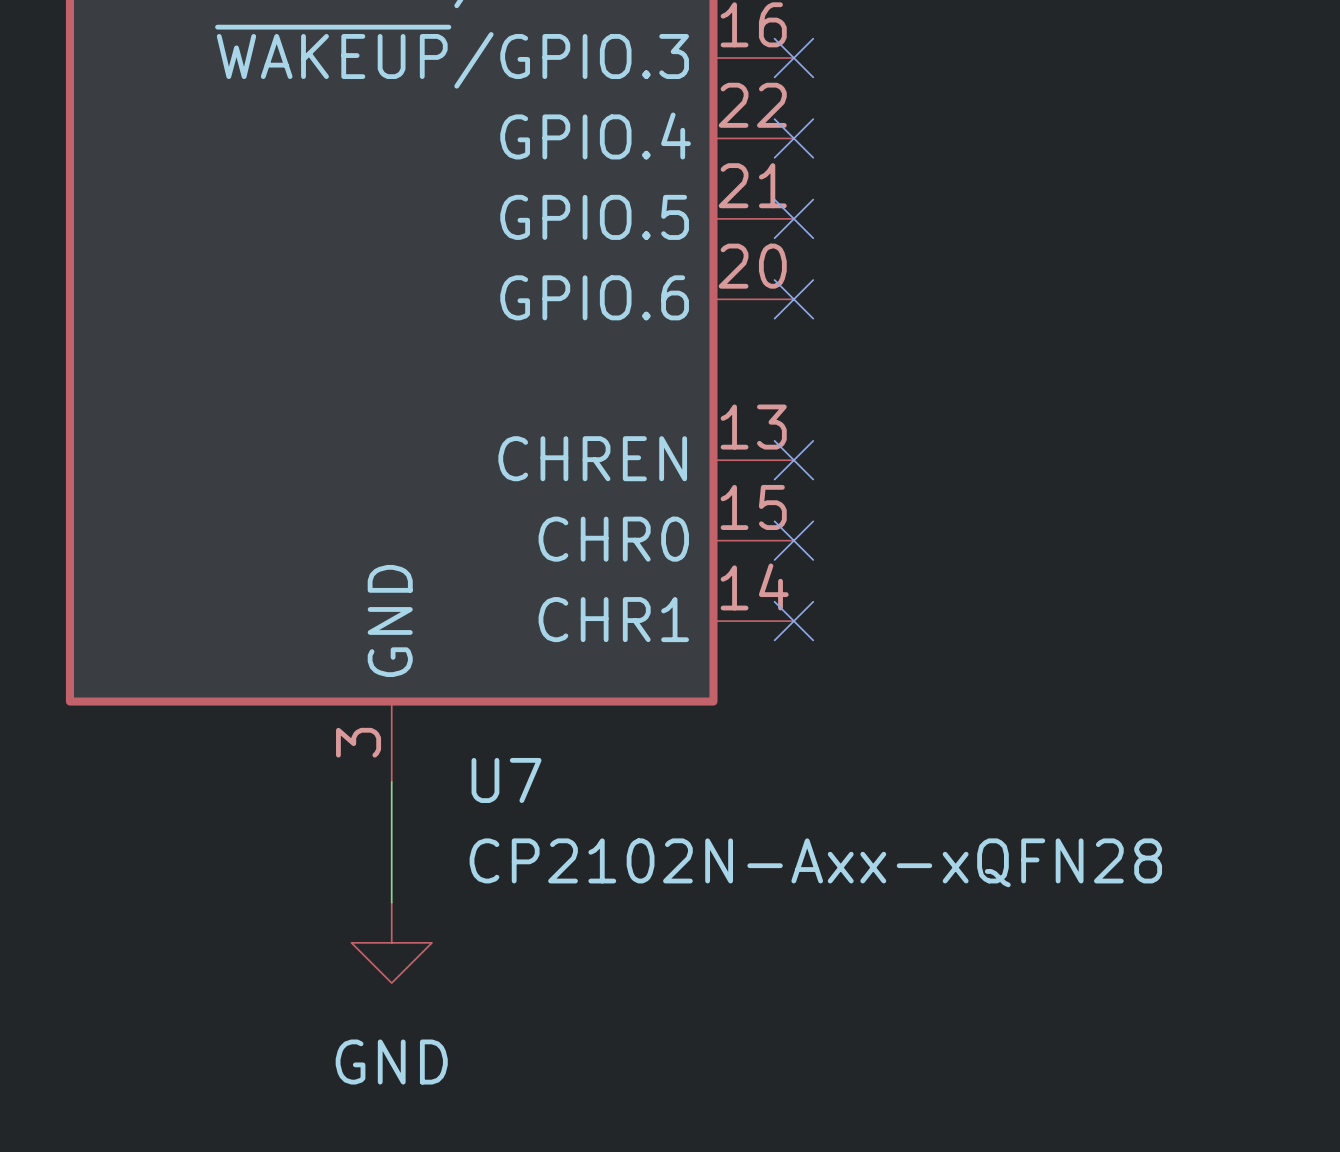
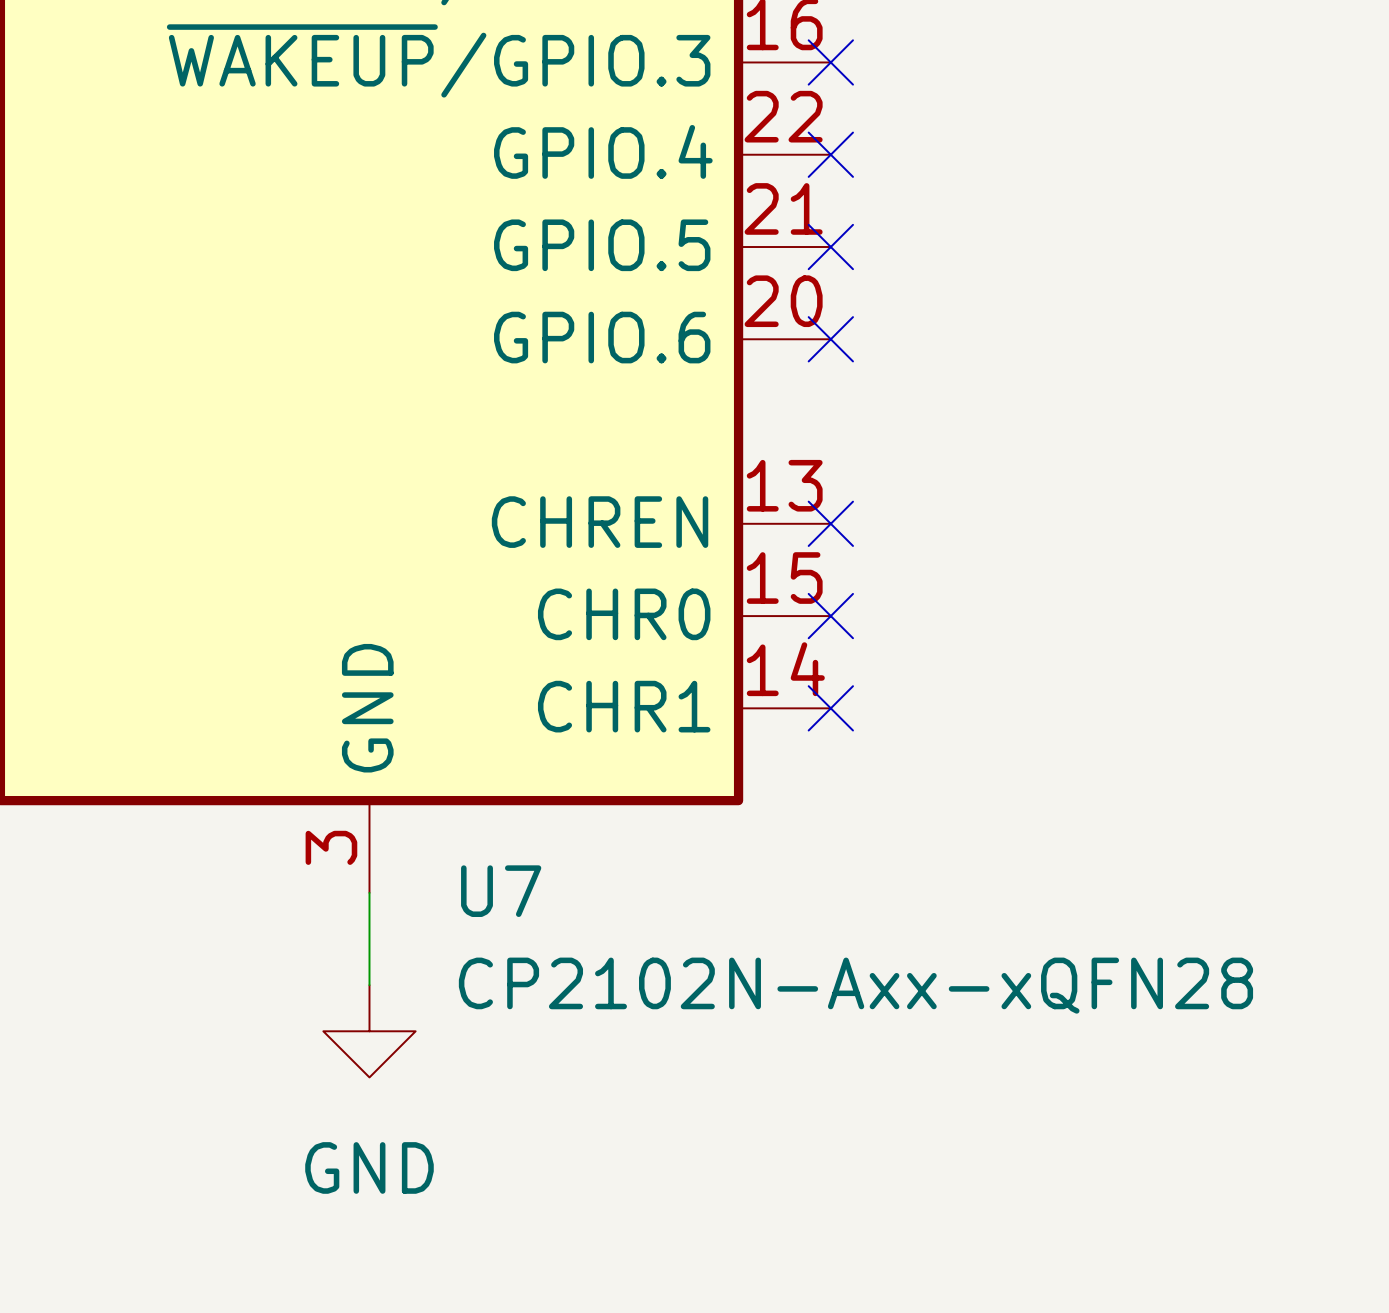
power symbol position: GND (391, 942) -> GND (369, 1031)

